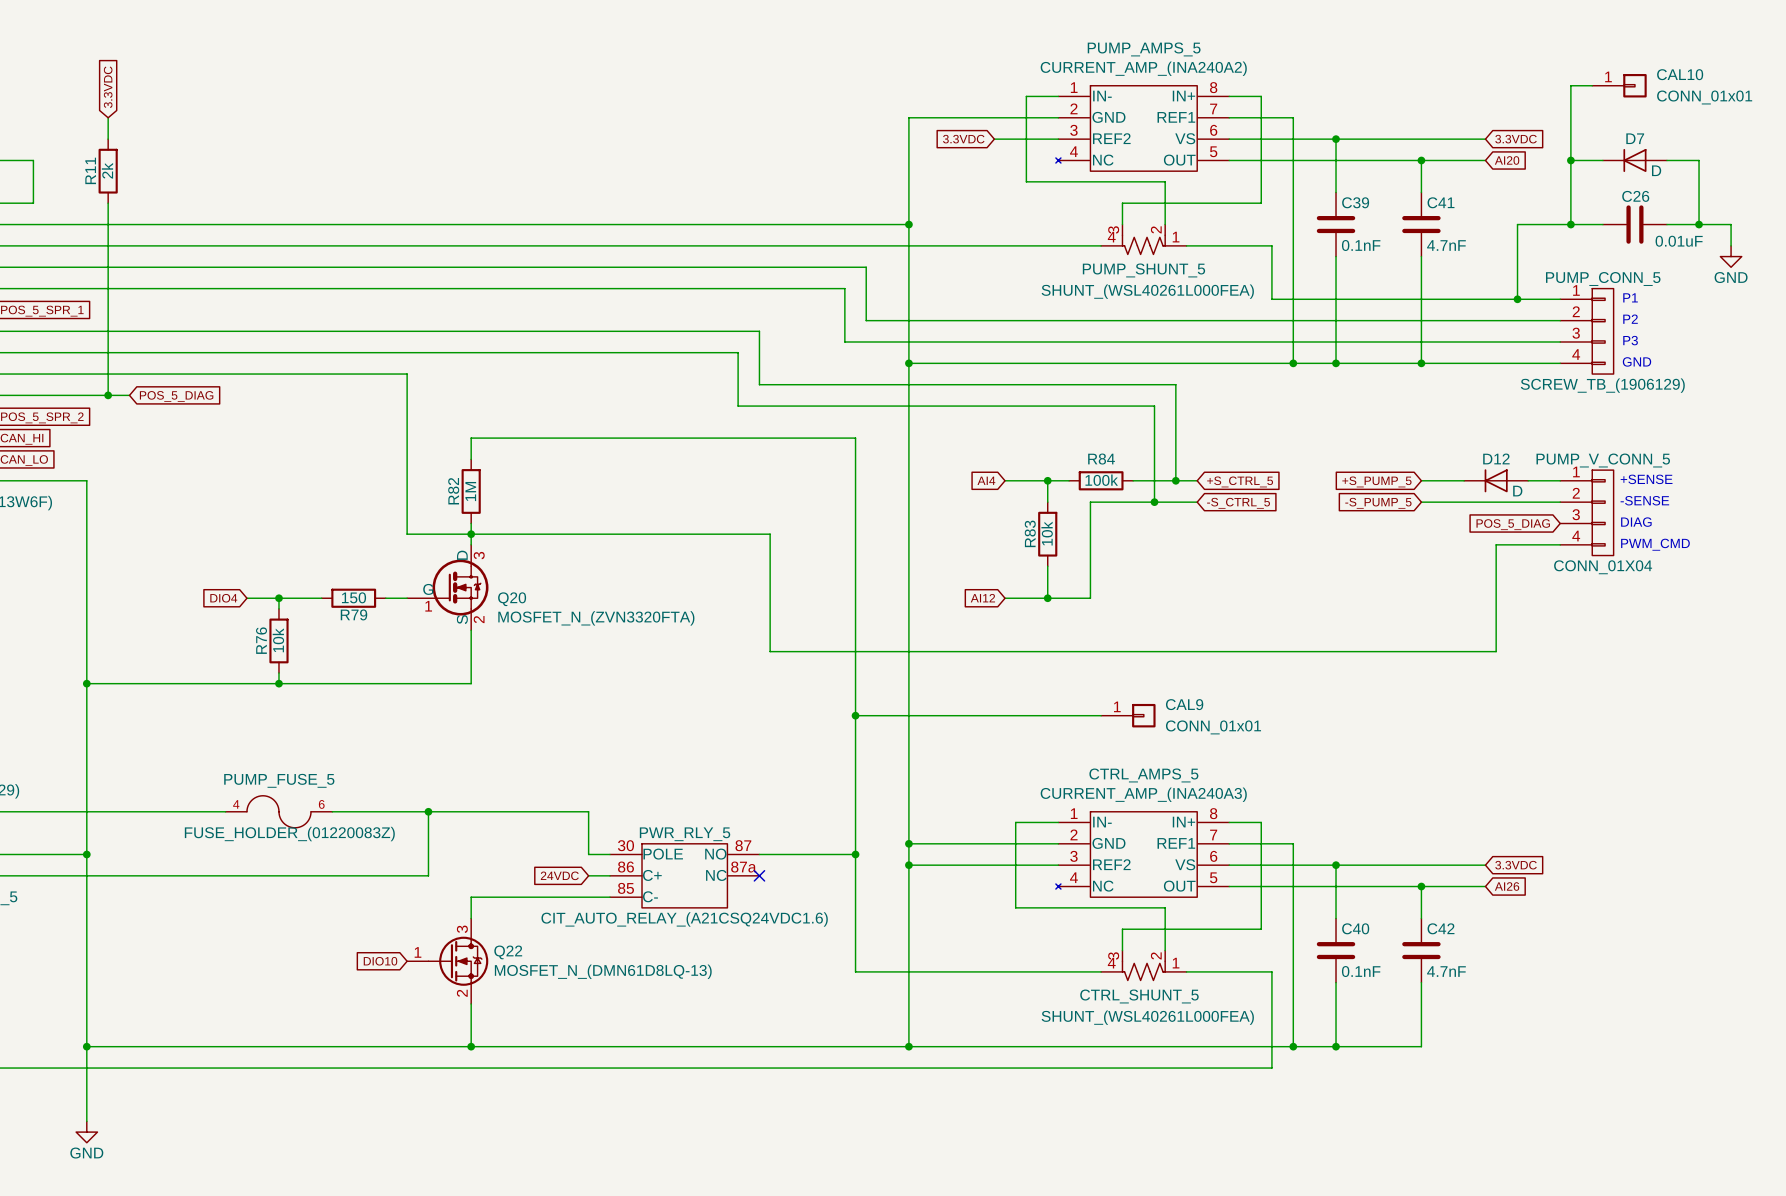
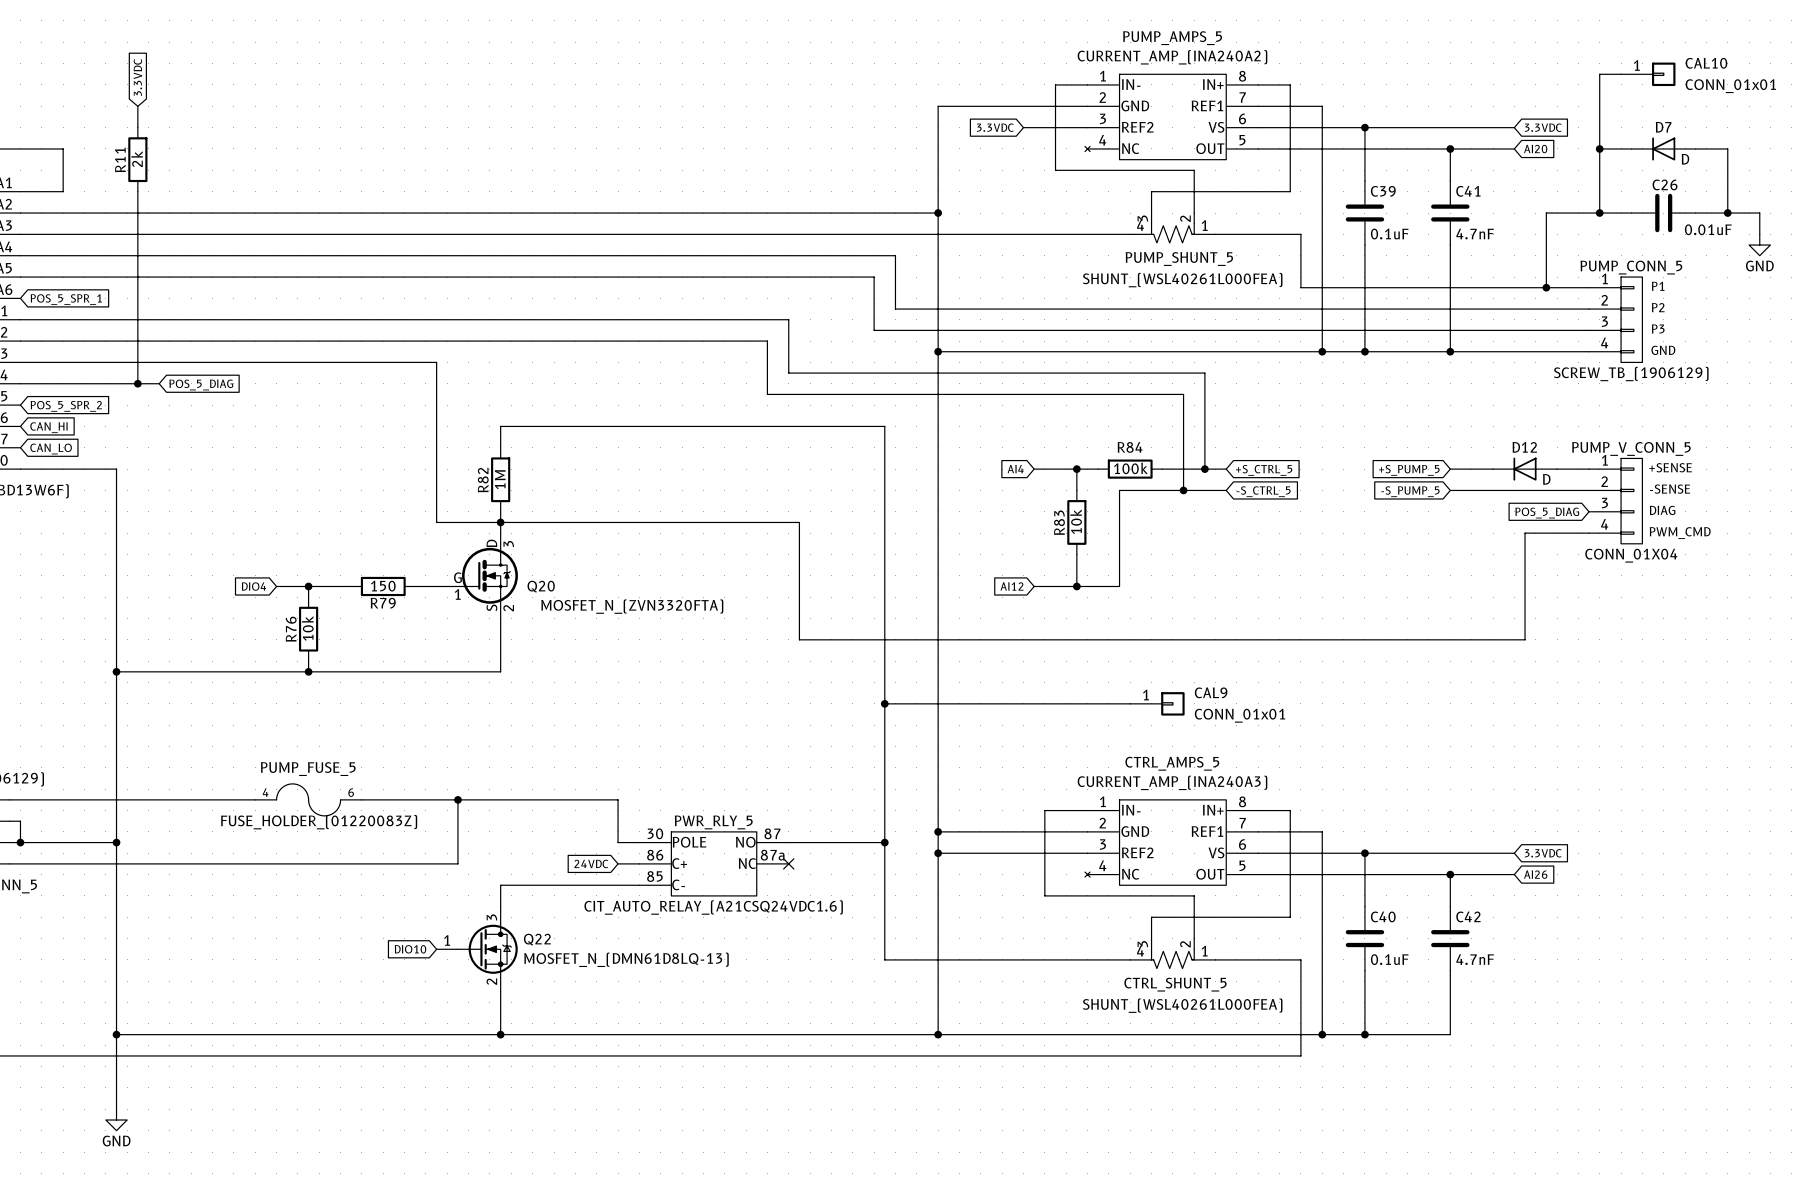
C39 value: 0.1nF (1361, 245) -> 0.1uF (1389, 234)
C40 value: 0.1nF (1361, 971) -> 0.1uF (1389, 959)

